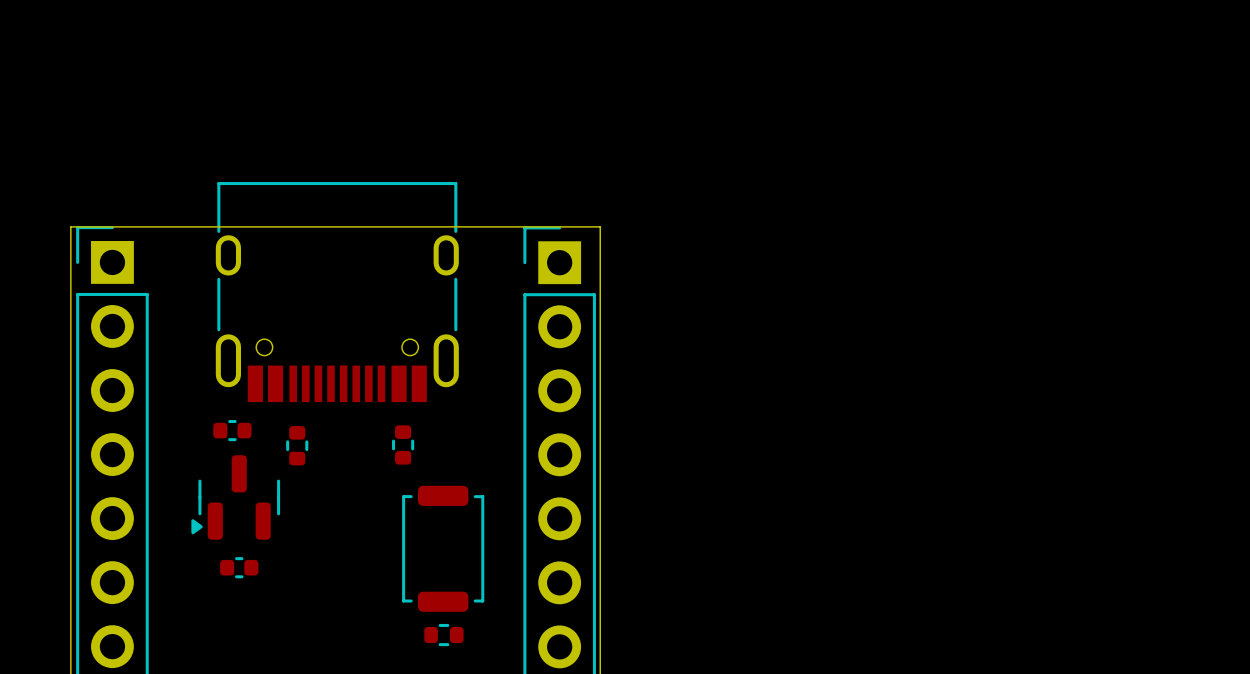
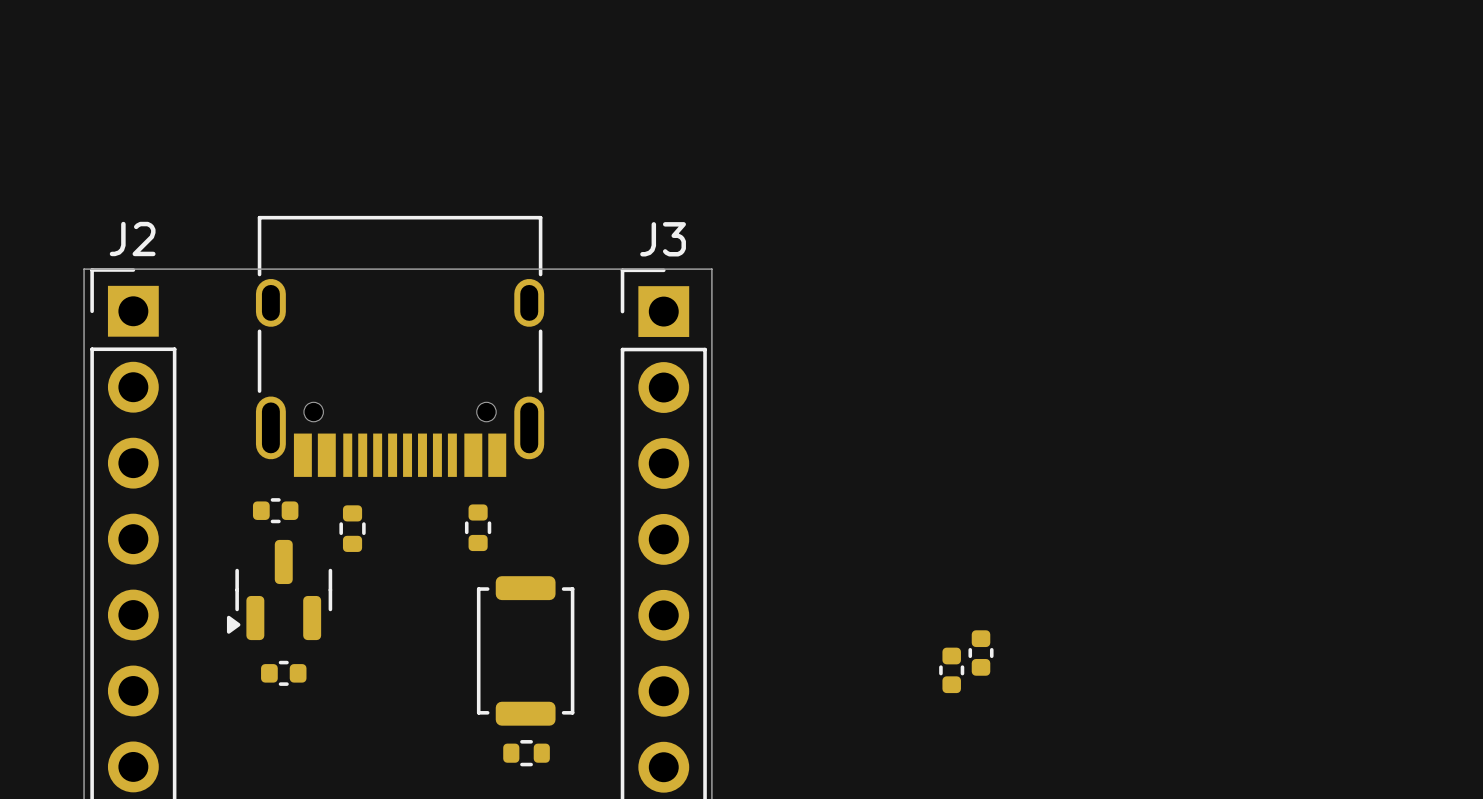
J2 name: none -> J2 (132, 238)
J3 name: none -> J3 (663, 239)
part: none -> (981, 653)
part: none -> (951, 670)

